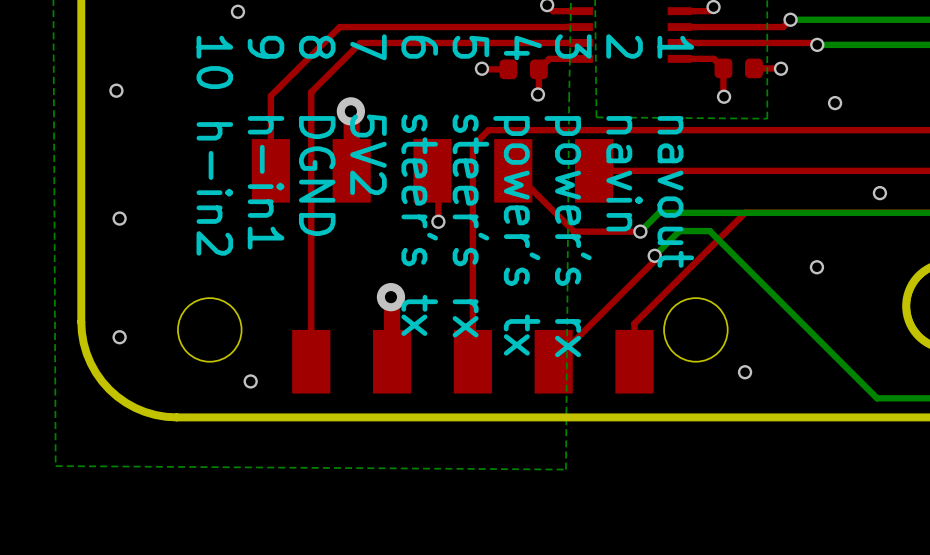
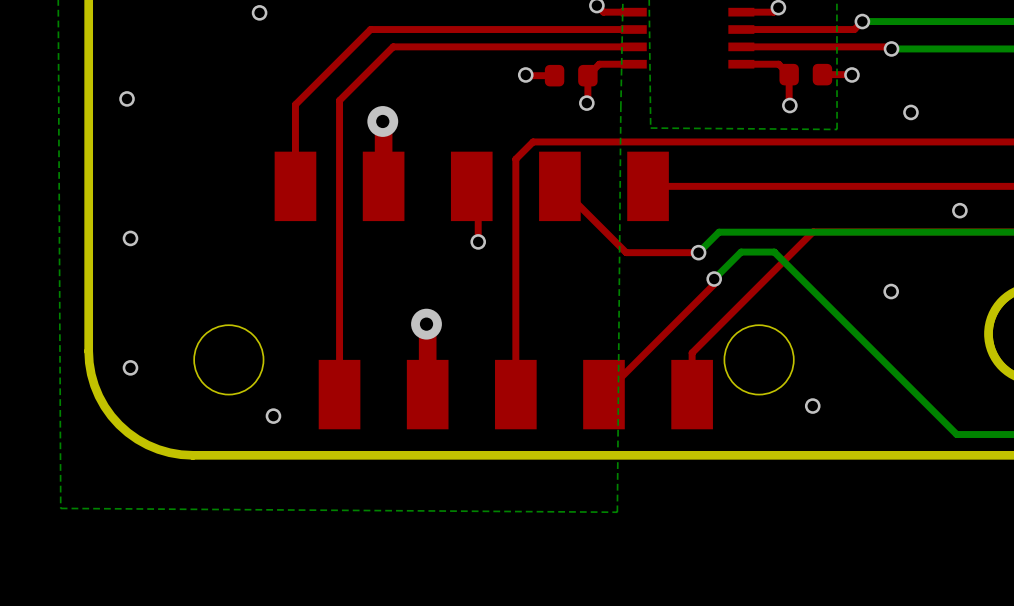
text: 7 5V2 (368, 114) -> none
text: 2 navin (624, 132) -> none
text: 8 DGND (317, 135) -> none
text: 9 h-in1 (266, 142) -> none
text: 10 h-in2 (214, 145) -> none
text: 1 navout (675, 151) -> none
text: 6 steer's tx (419, 185) -> none
text: 5 steer's rx (470, 186) -> none
text: 4 power's tx (517, 195) -> none
text: 3 power's rx (568, 195) -> none

